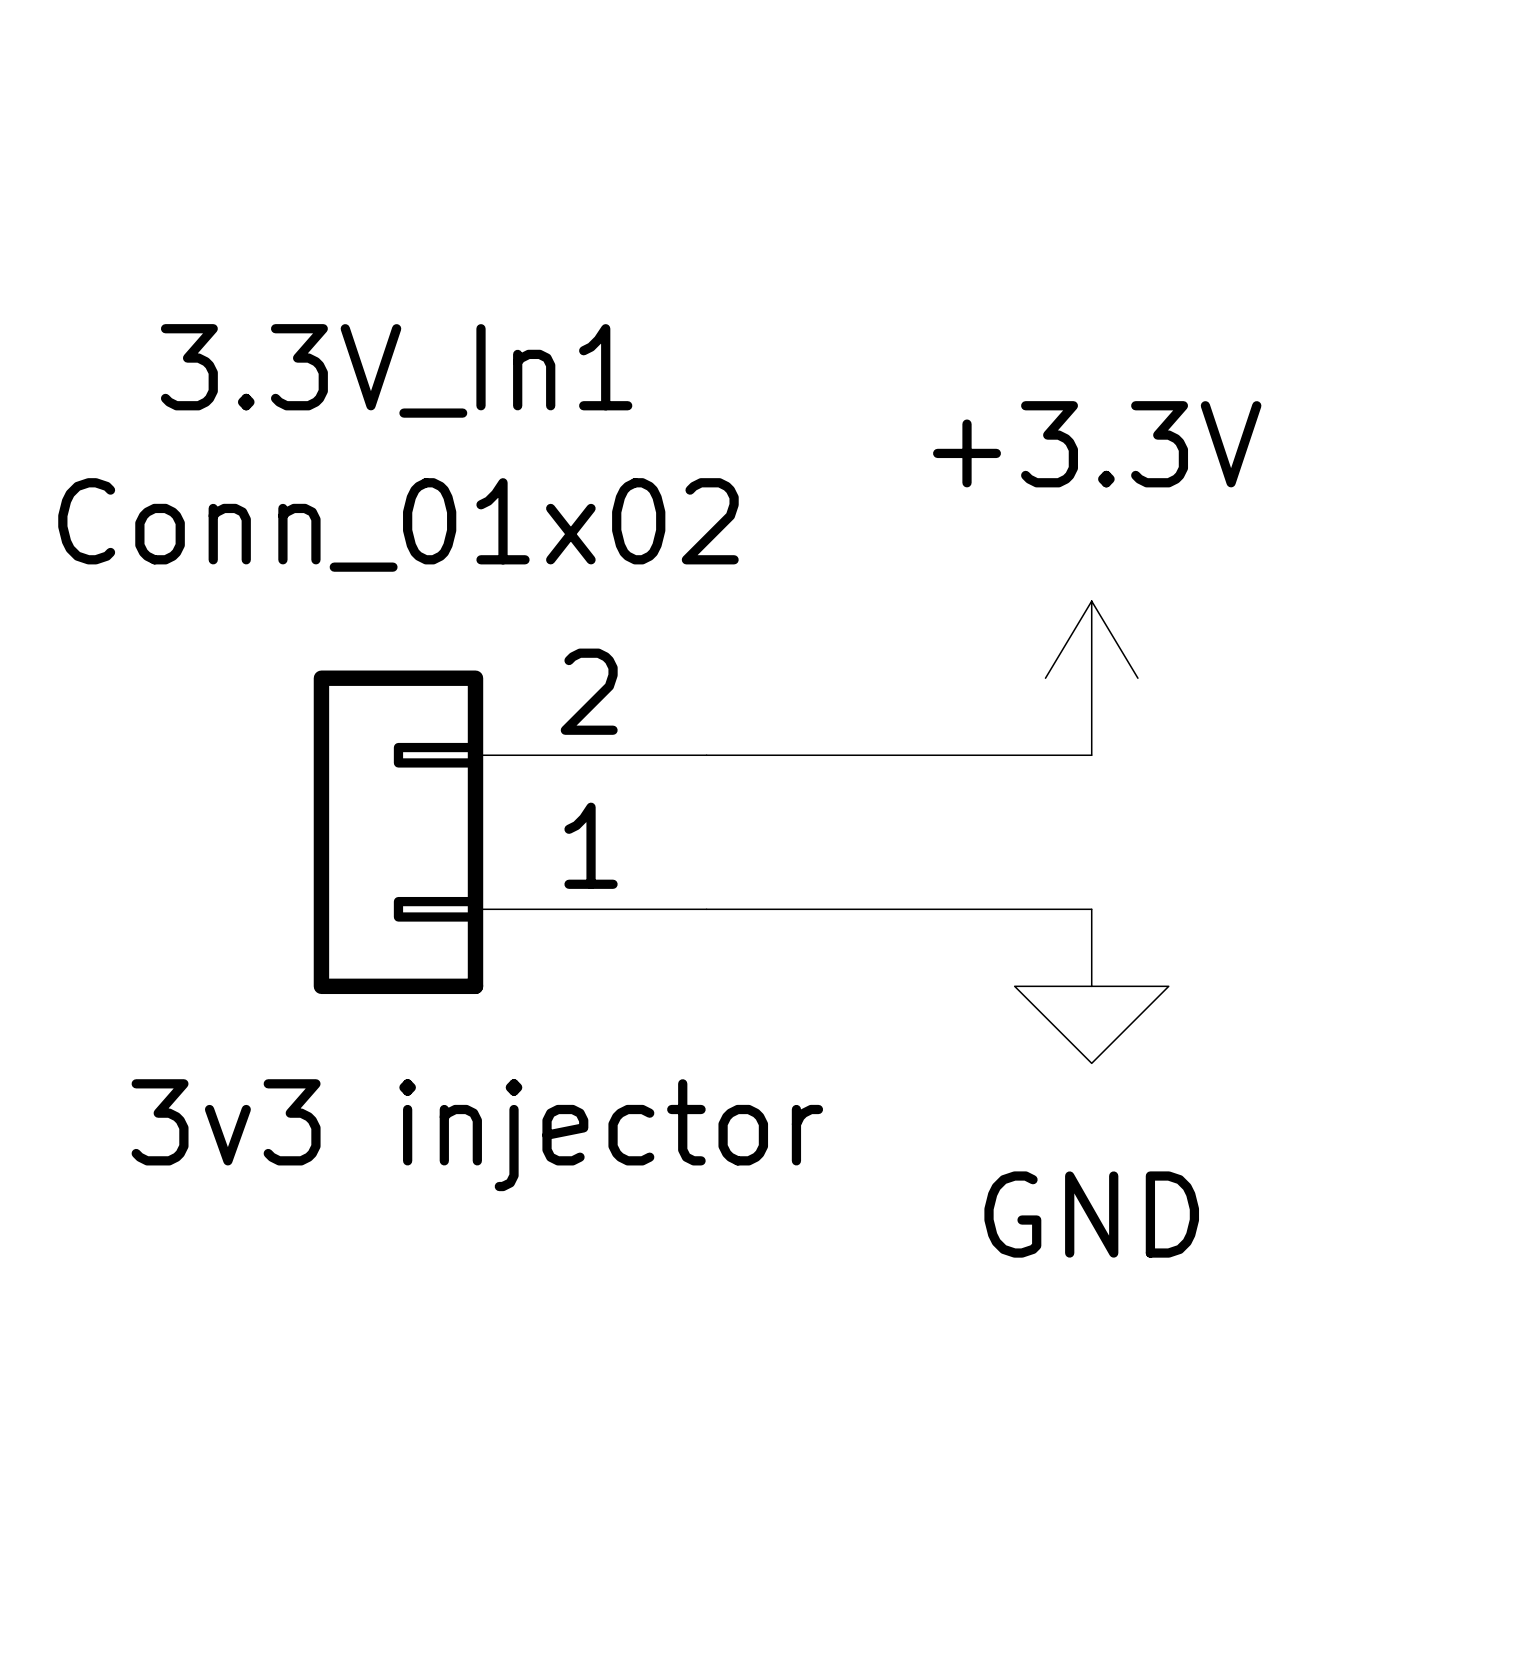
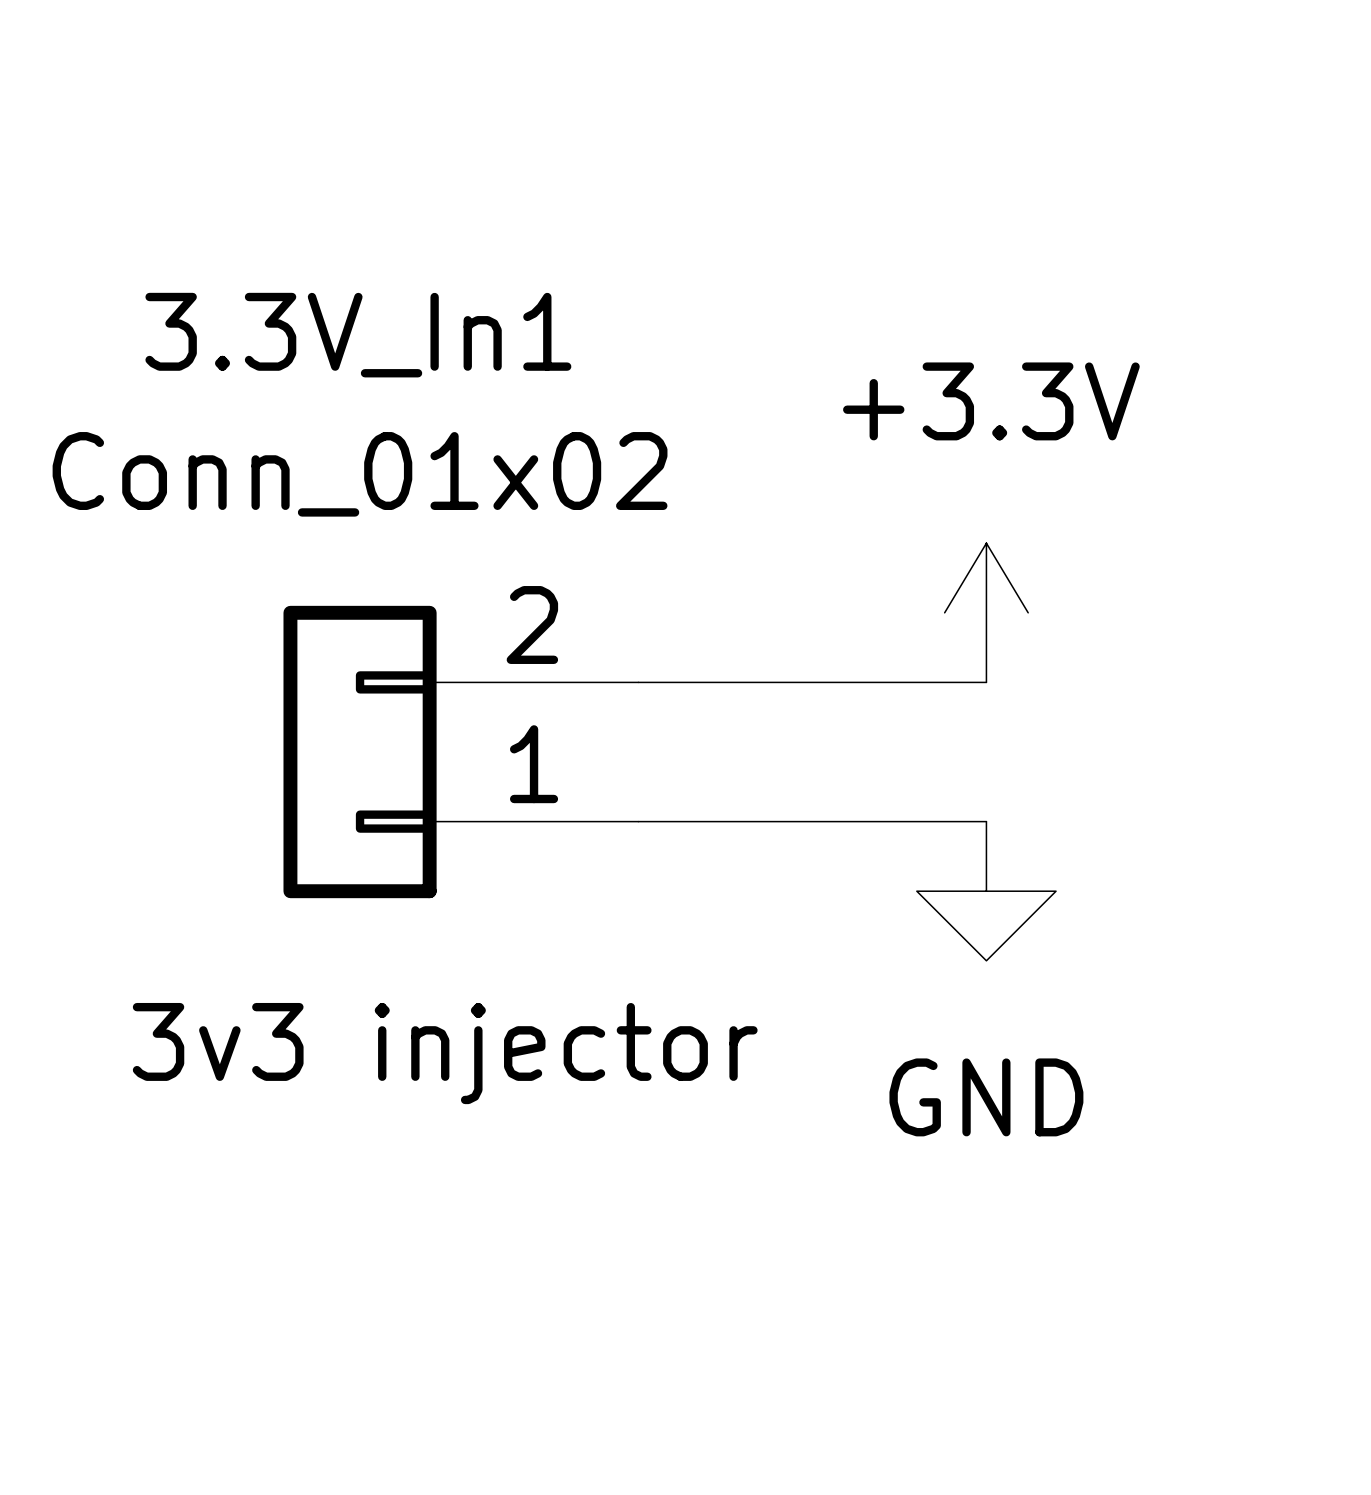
text position: 3v3 injector (477, 1135) -> 3v3 injector (445, 1053)

